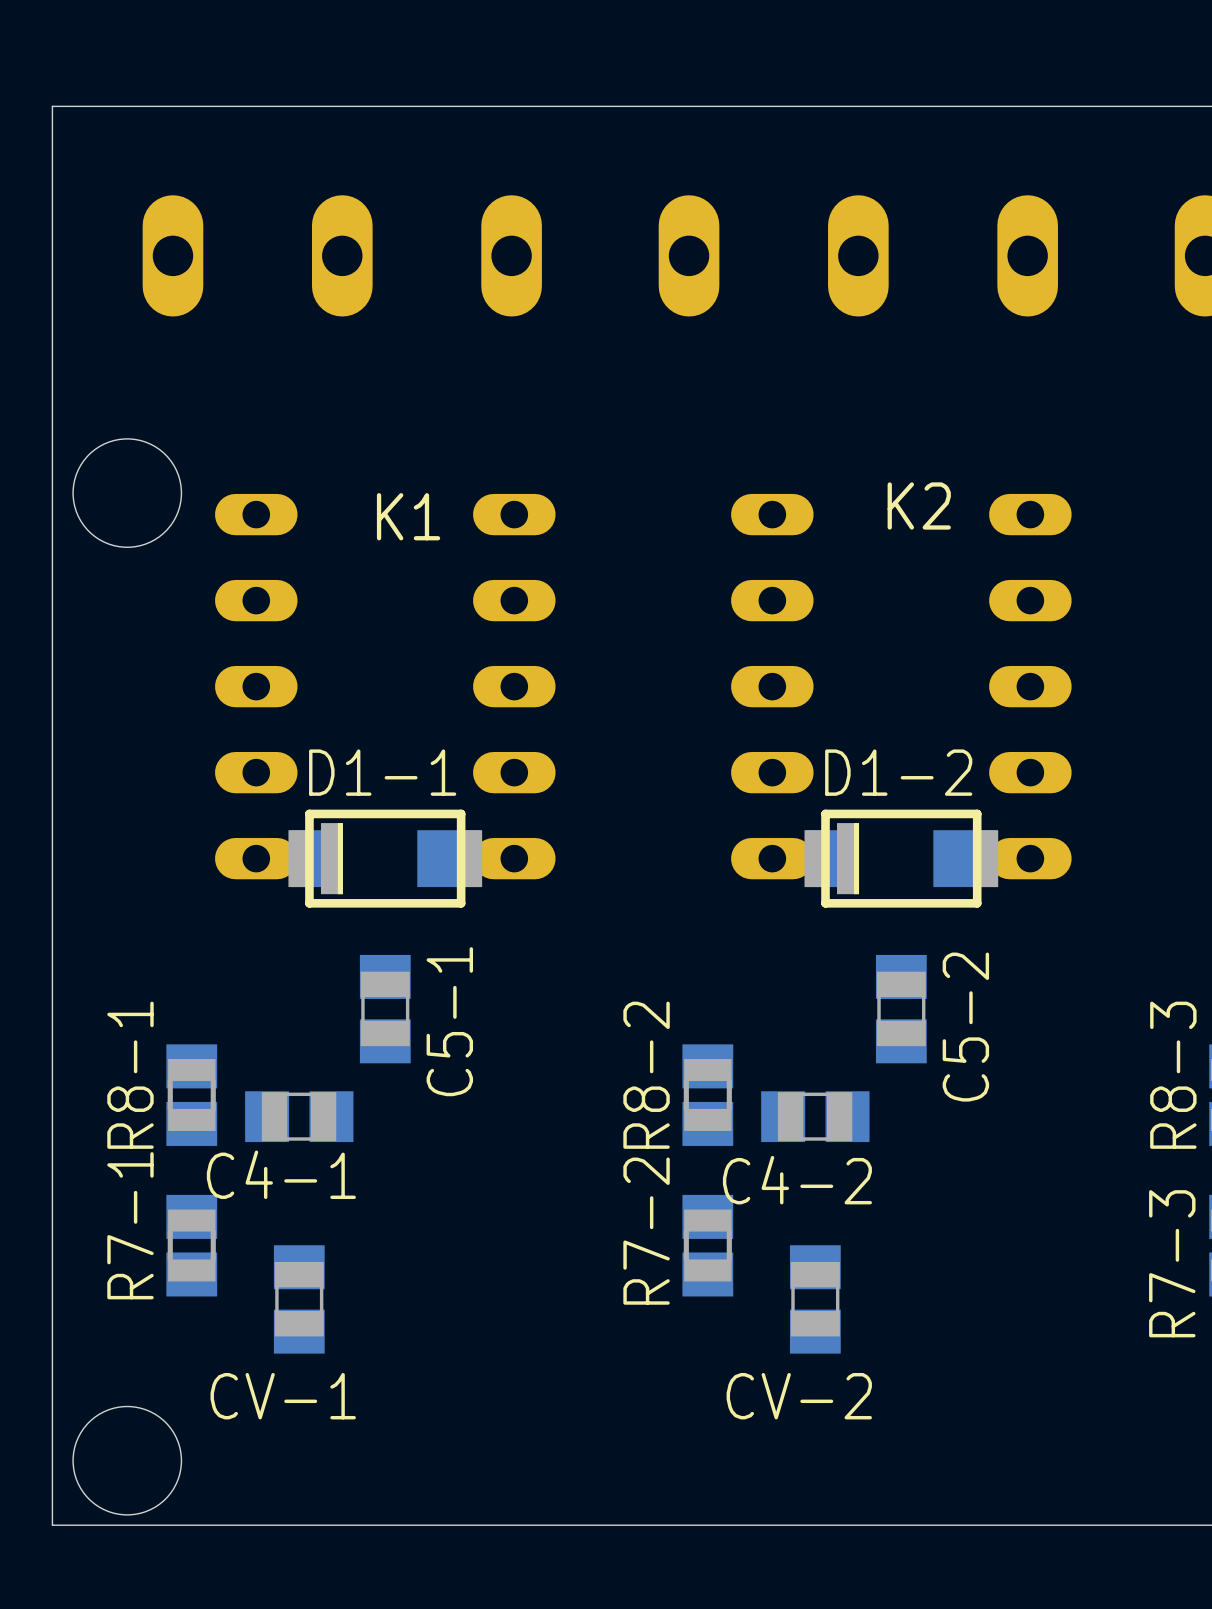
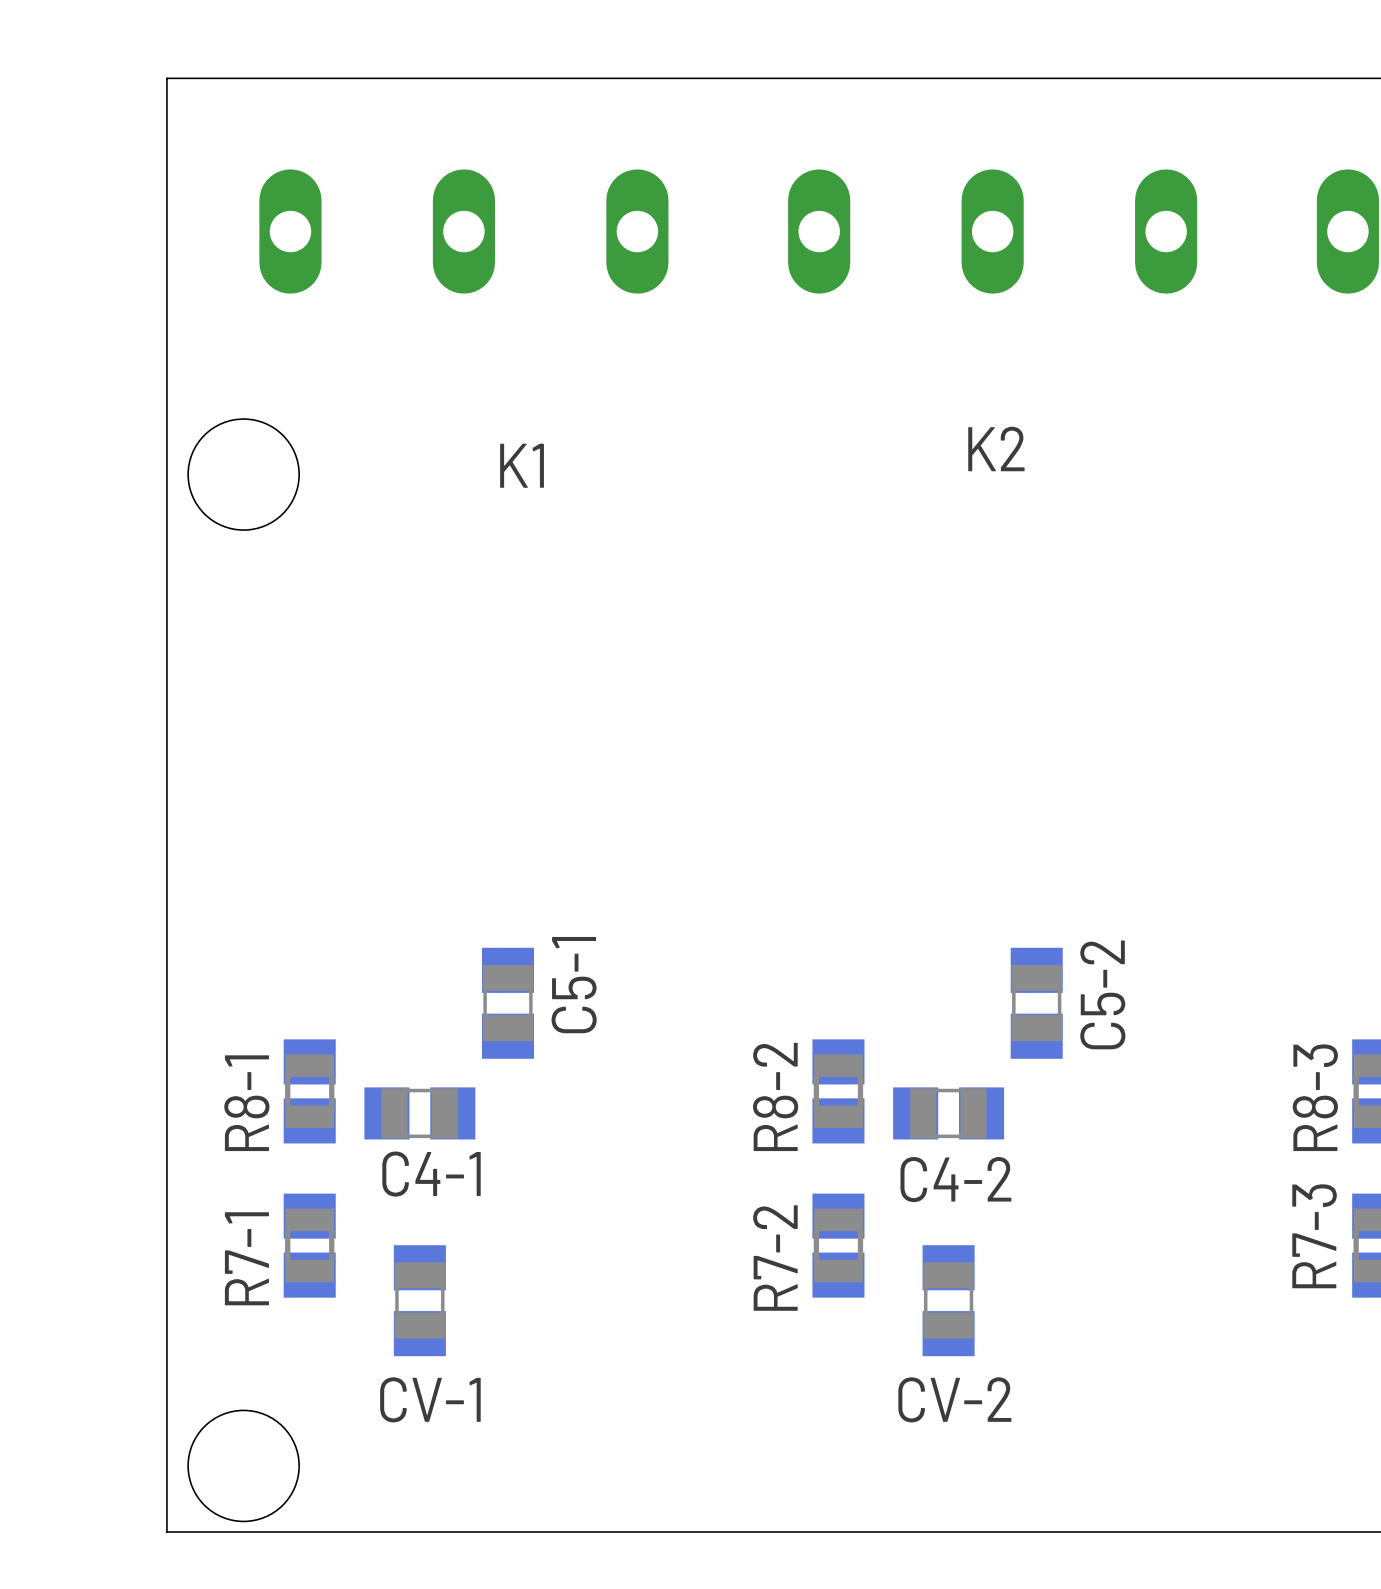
K1 footprint: [214, 493, 556, 880] -> [500, 443, 544, 488]
K2 footprint: [731, 493, 1072, 880] -> [968, 426, 1025, 472]
K2 name position: K2 (919, 505) -> K2 (996, 448)
K1 name position: K1 (408, 516) -> K1 (522, 465)
D1-1: (385, 858) -> none
D1-2: (901, 858) -> none

